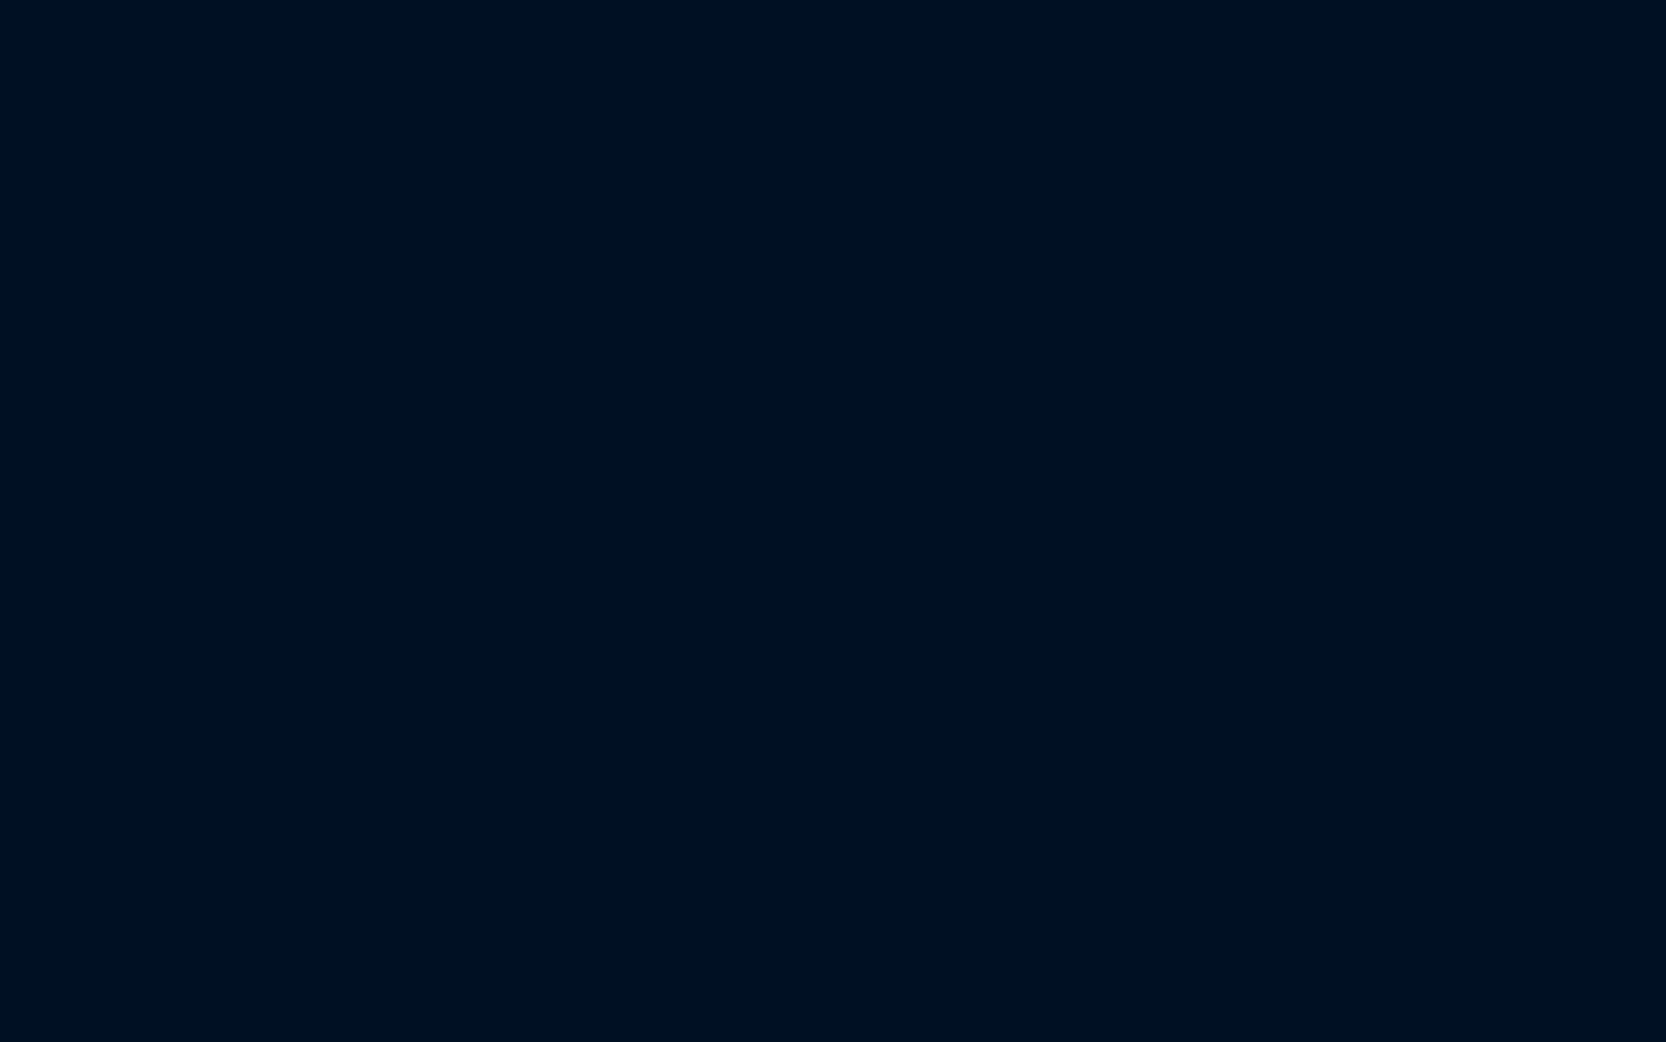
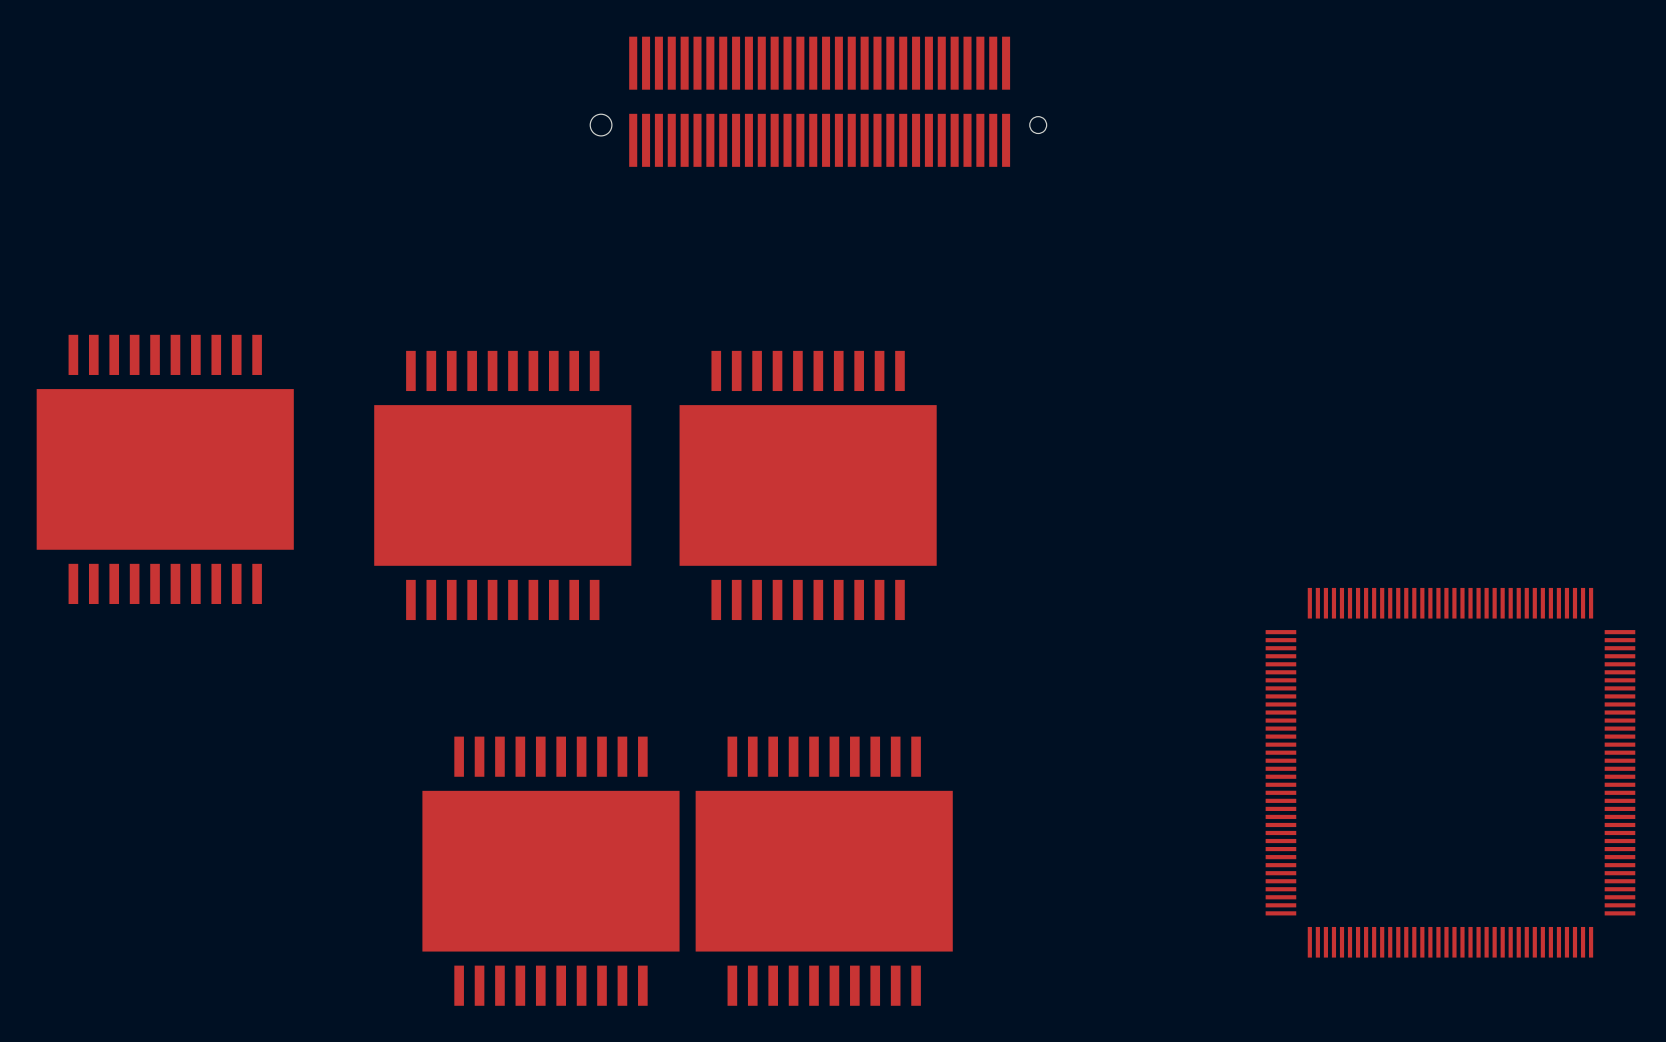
part: none -> (818, 101)
part: none -> (165, 469)
part: none -> (502, 485)
part: none -> (808, 485)
part: none -> (1450, 772)
part: none -> (550, 871)
part: none -> (824, 871)

